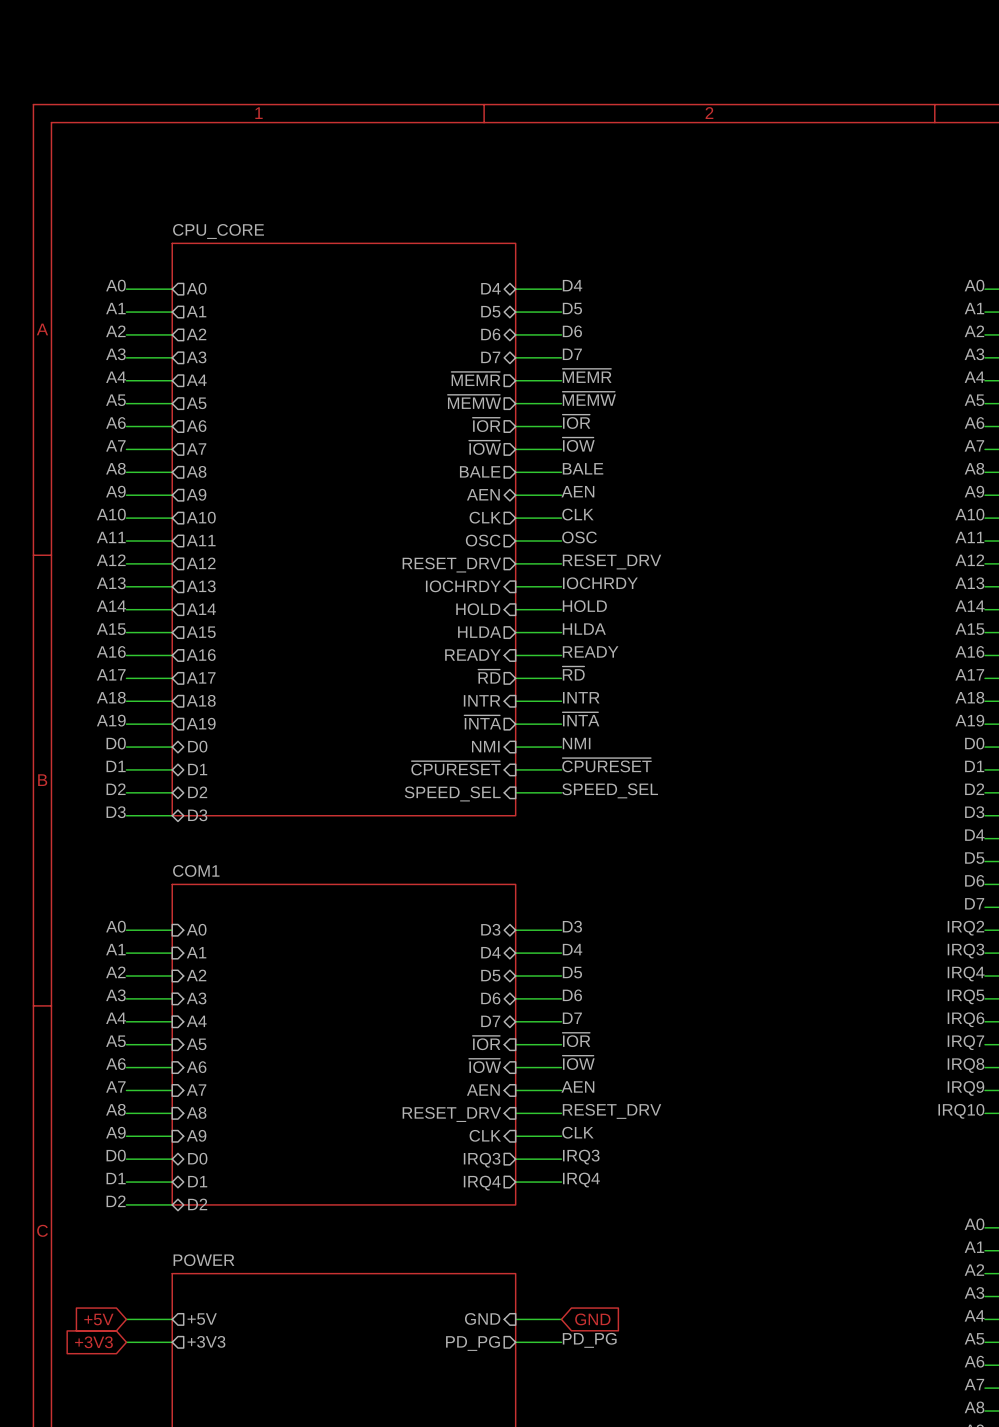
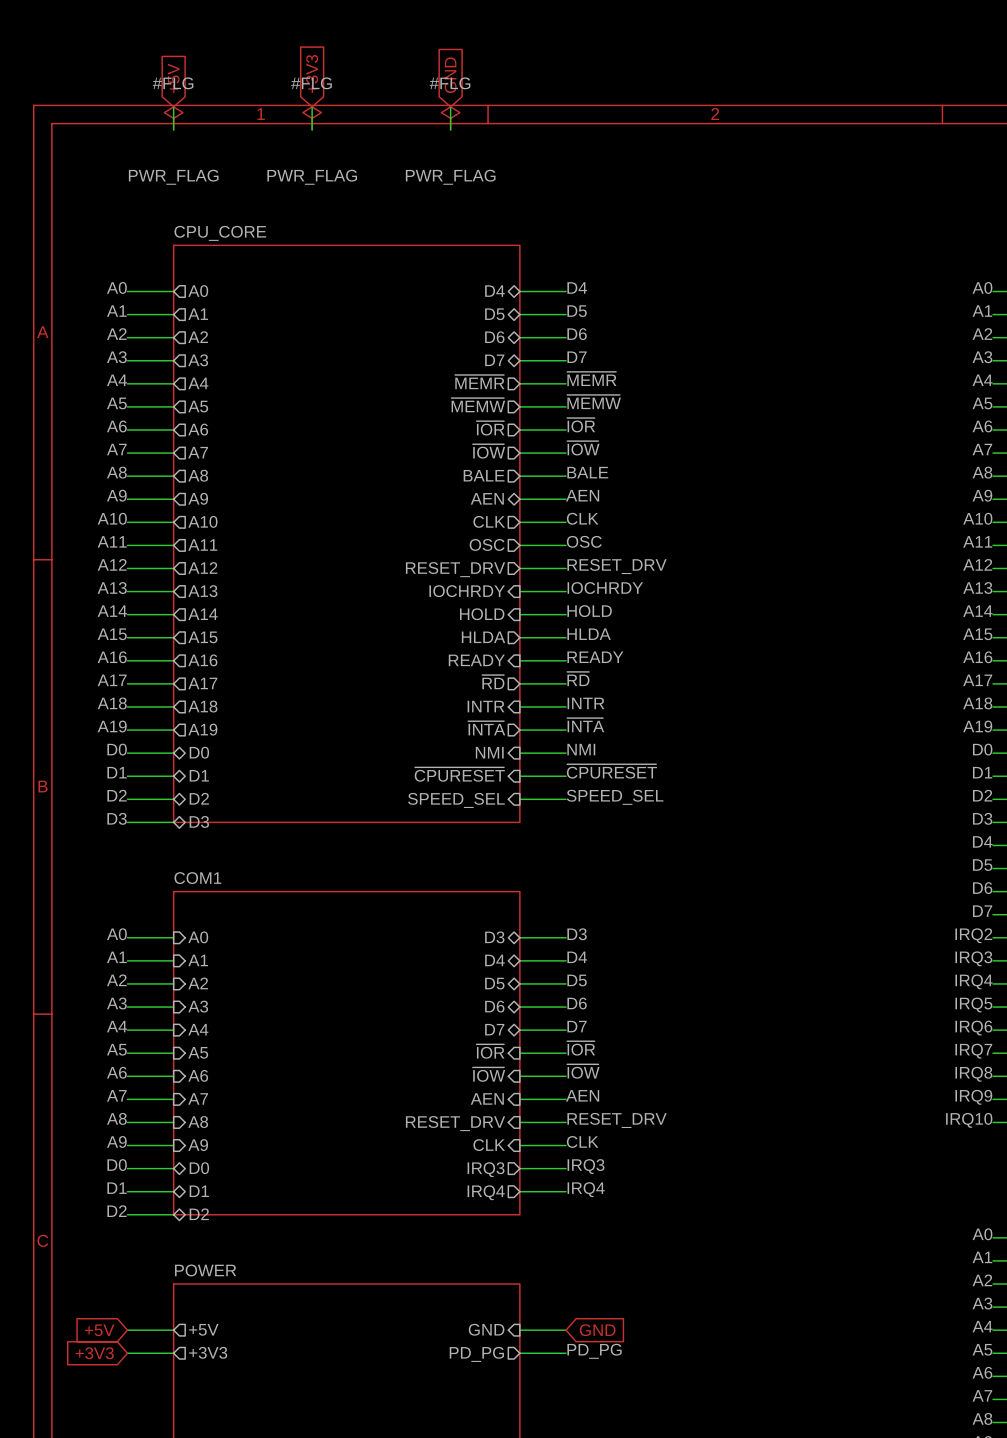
global label: none -> +3V3 (312, 74)
global label: none -> GND (450, 75)
global label: none -> +5V (173, 78)
wire: none -> (173, 106) (173, 129)
wire: none -> (312, 106) (312, 129)
wire: none -> (450, 106) (450, 129)
#FLG: none -> PWR_FLAG (173, 118)
#FLG: none -> PWR_FLAG (312, 118)
#FLG: none -> PWR_FLAG (450, 118)

